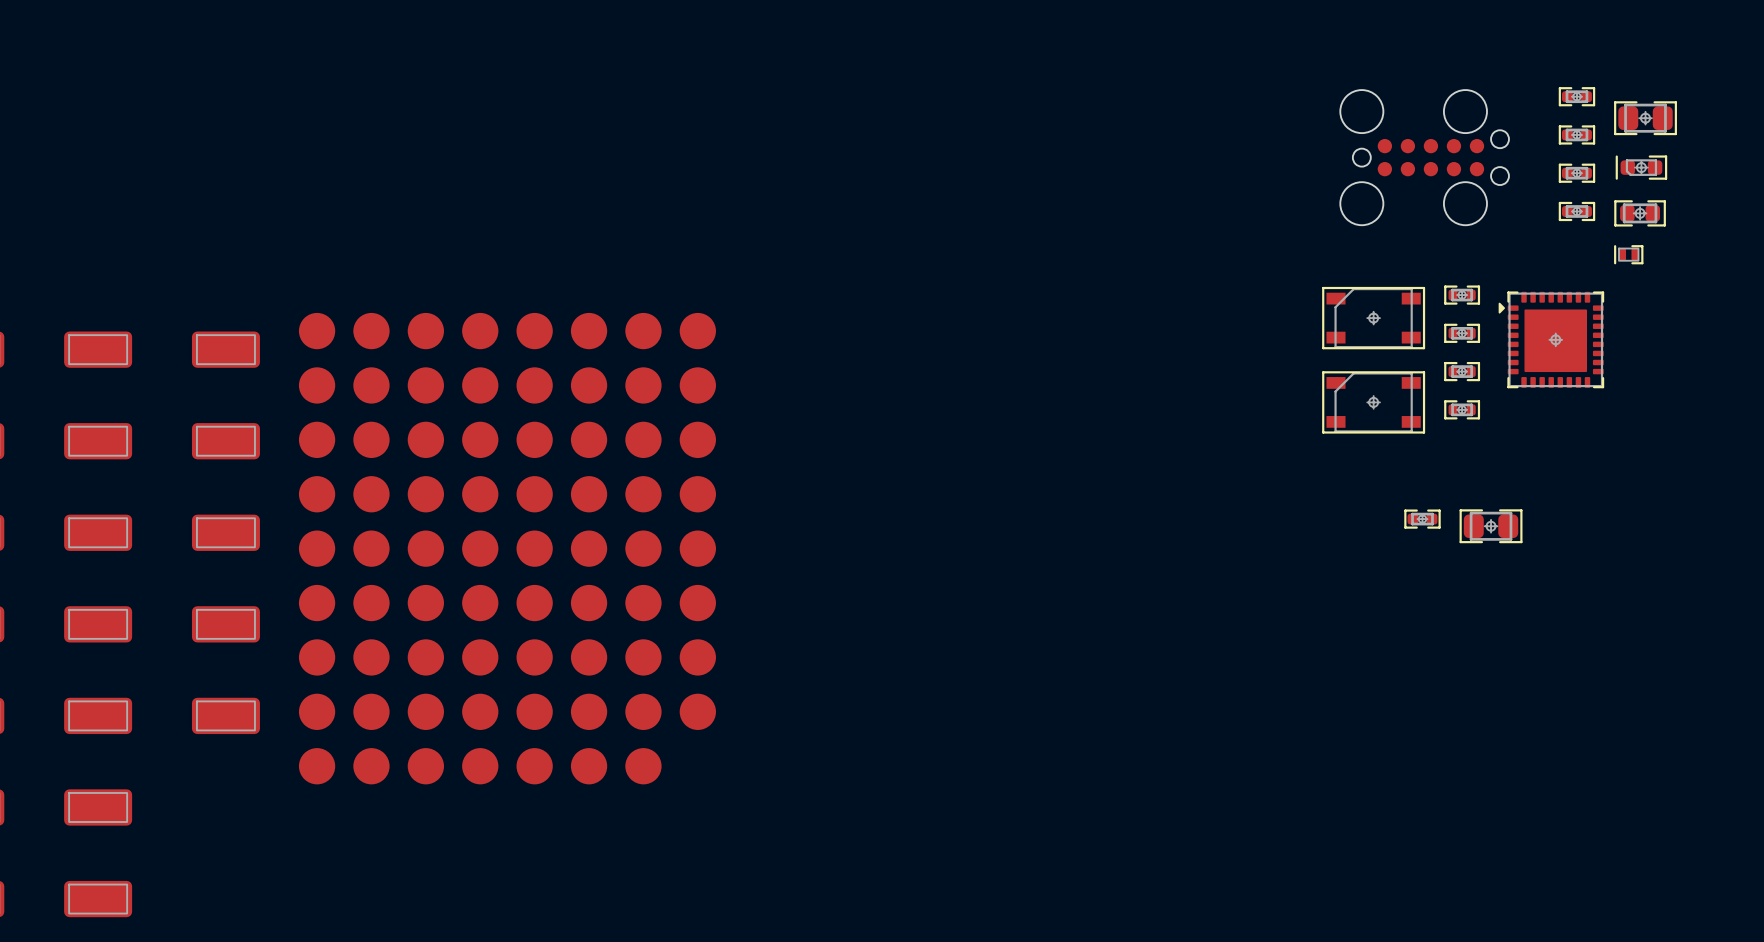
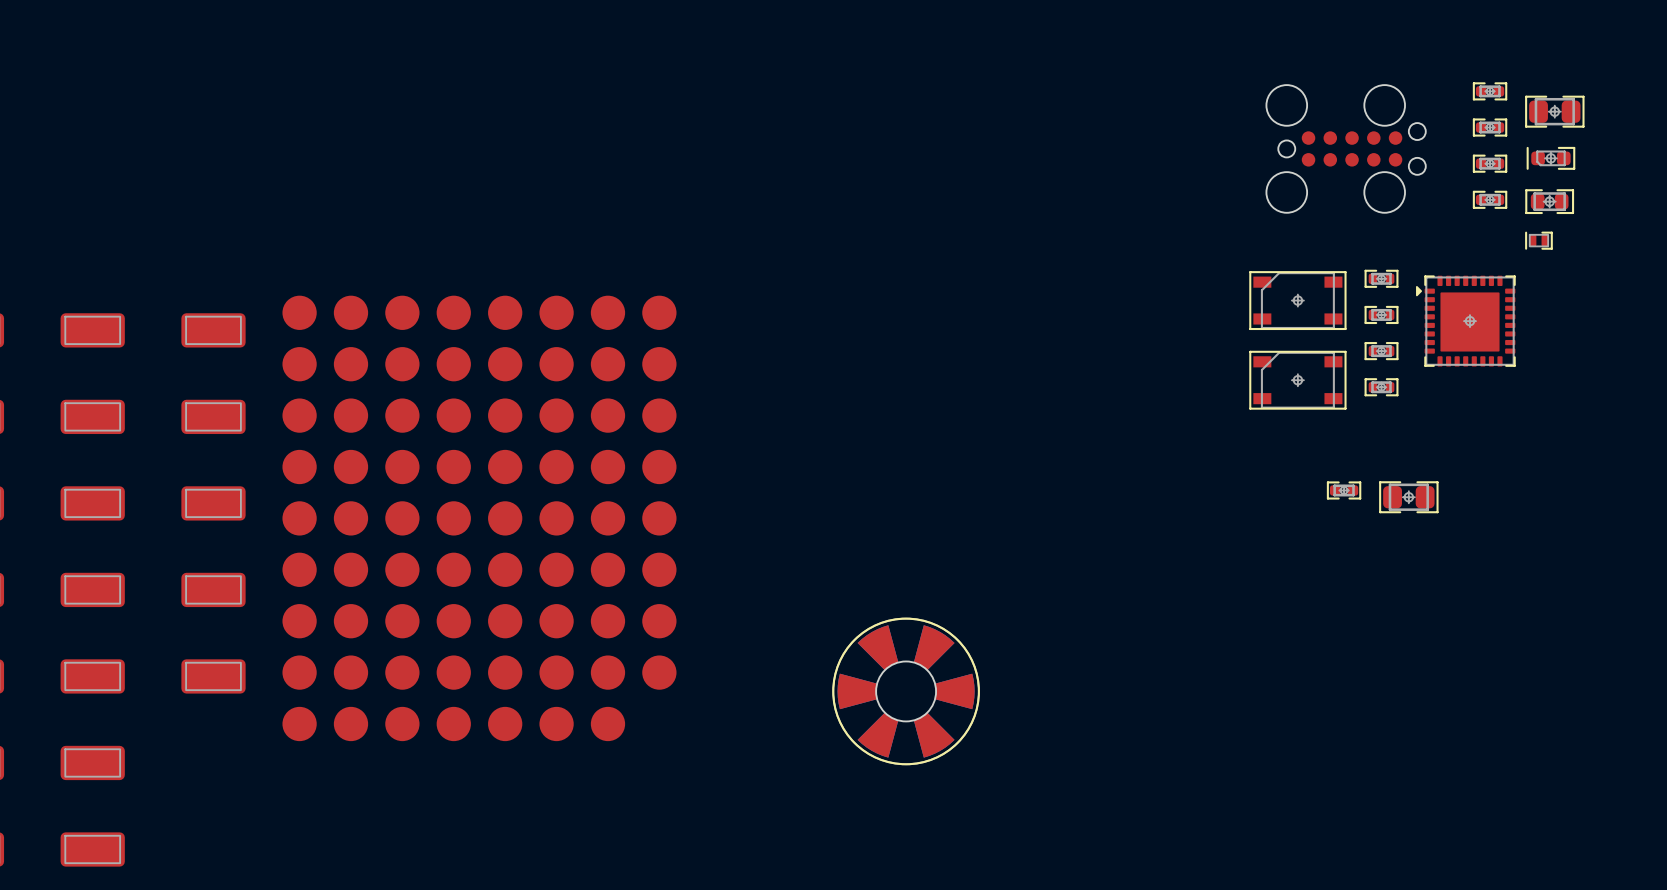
part: none -> (906, 691)

